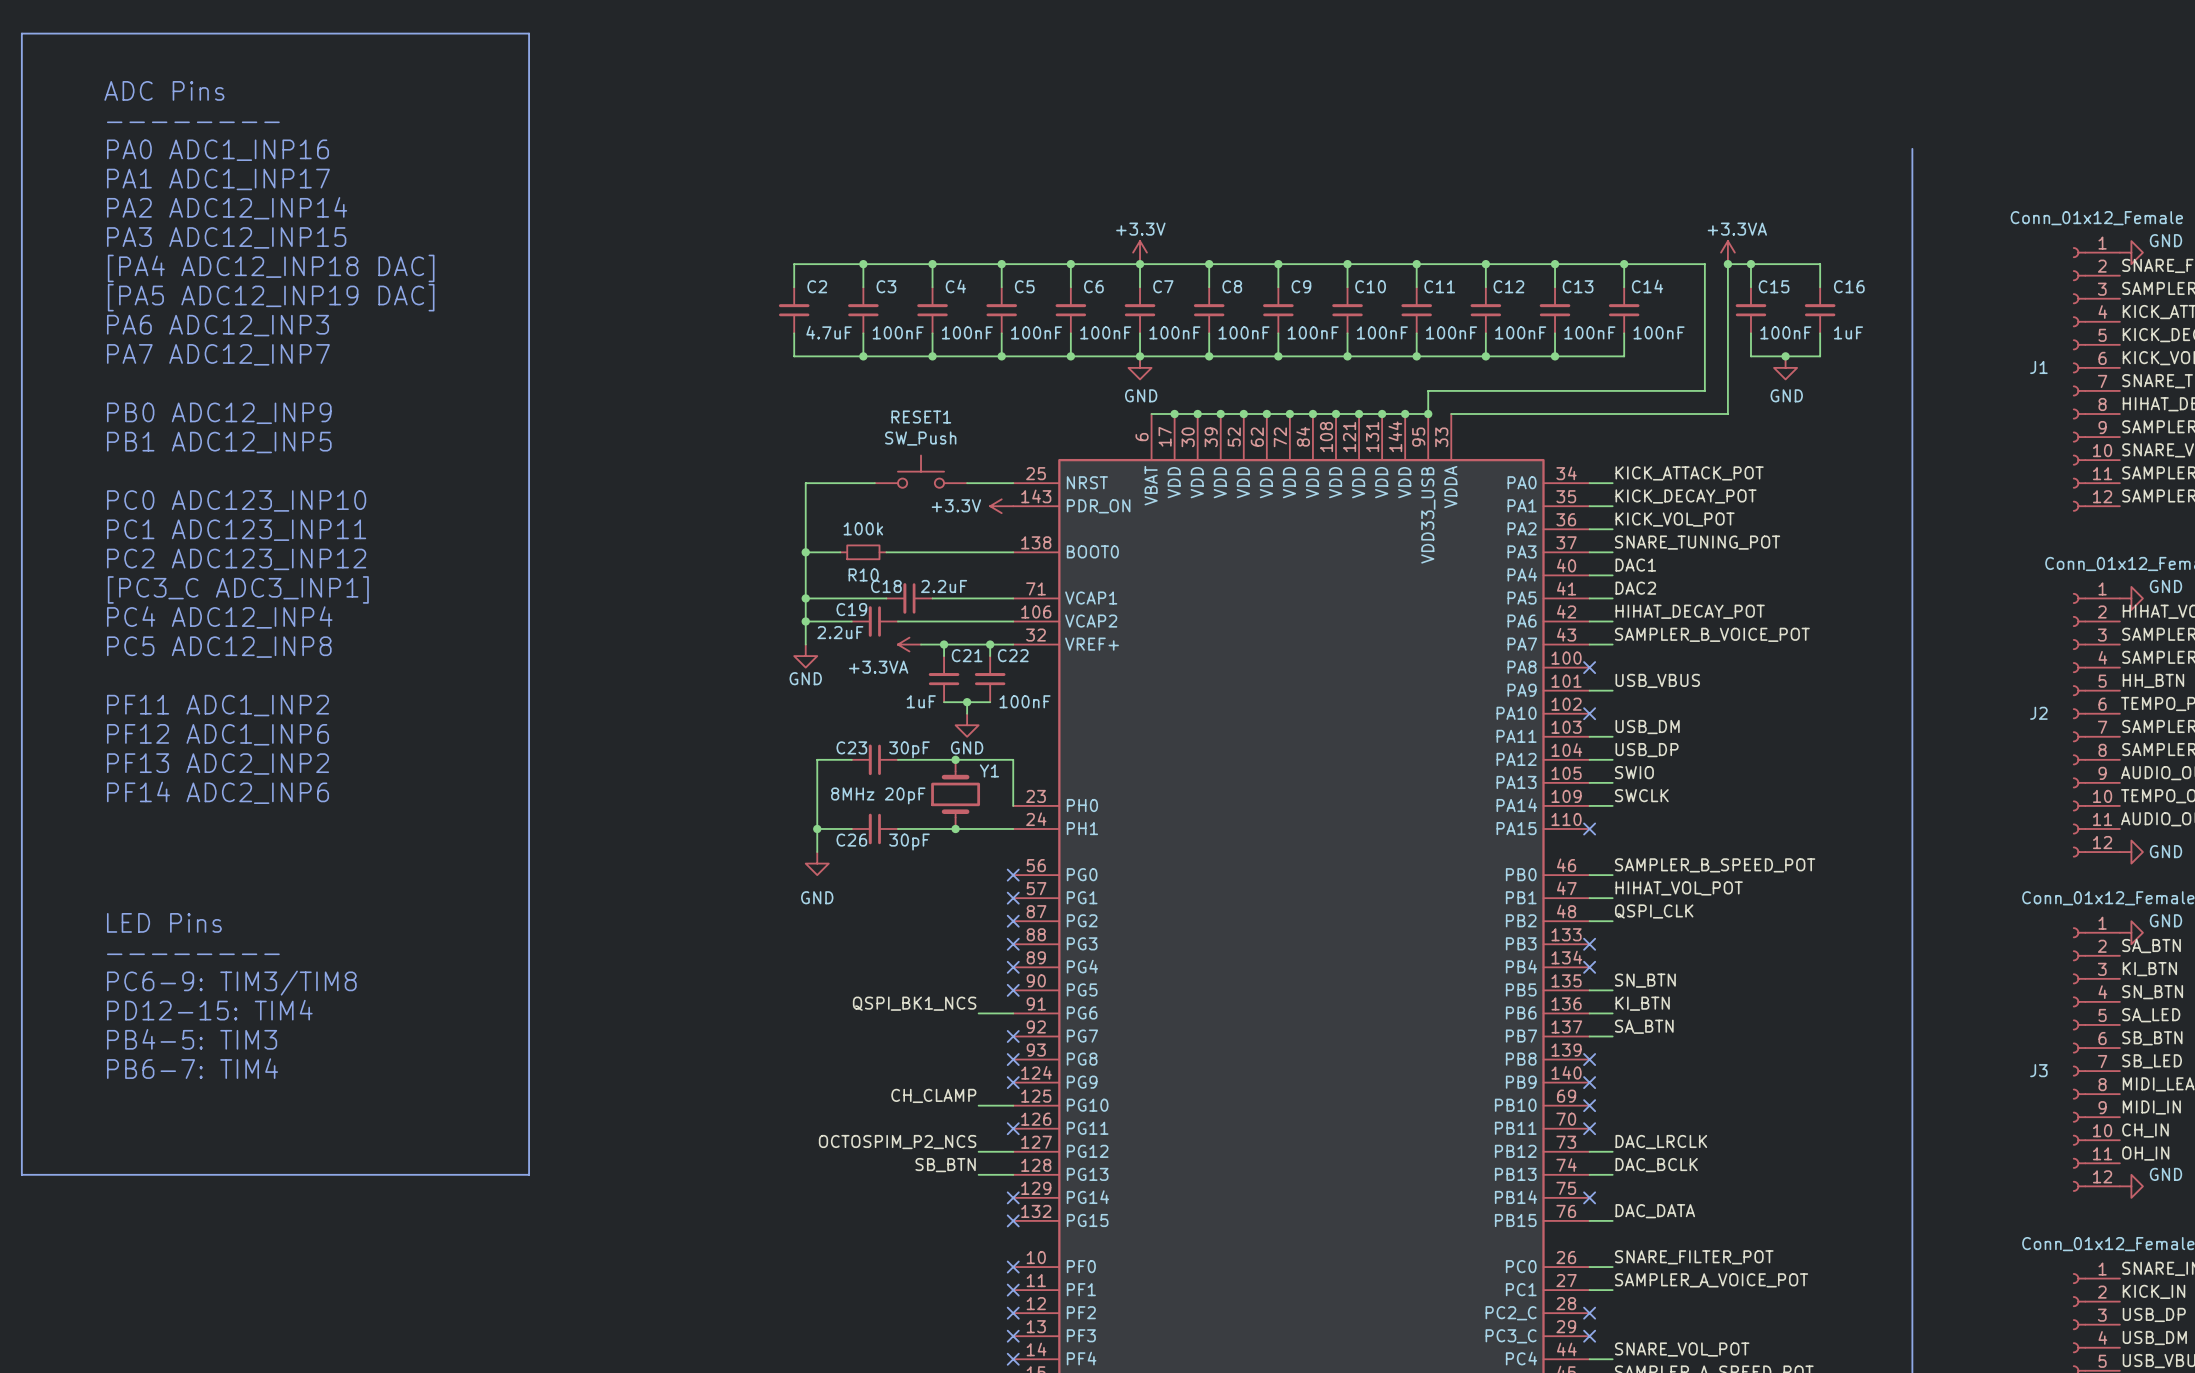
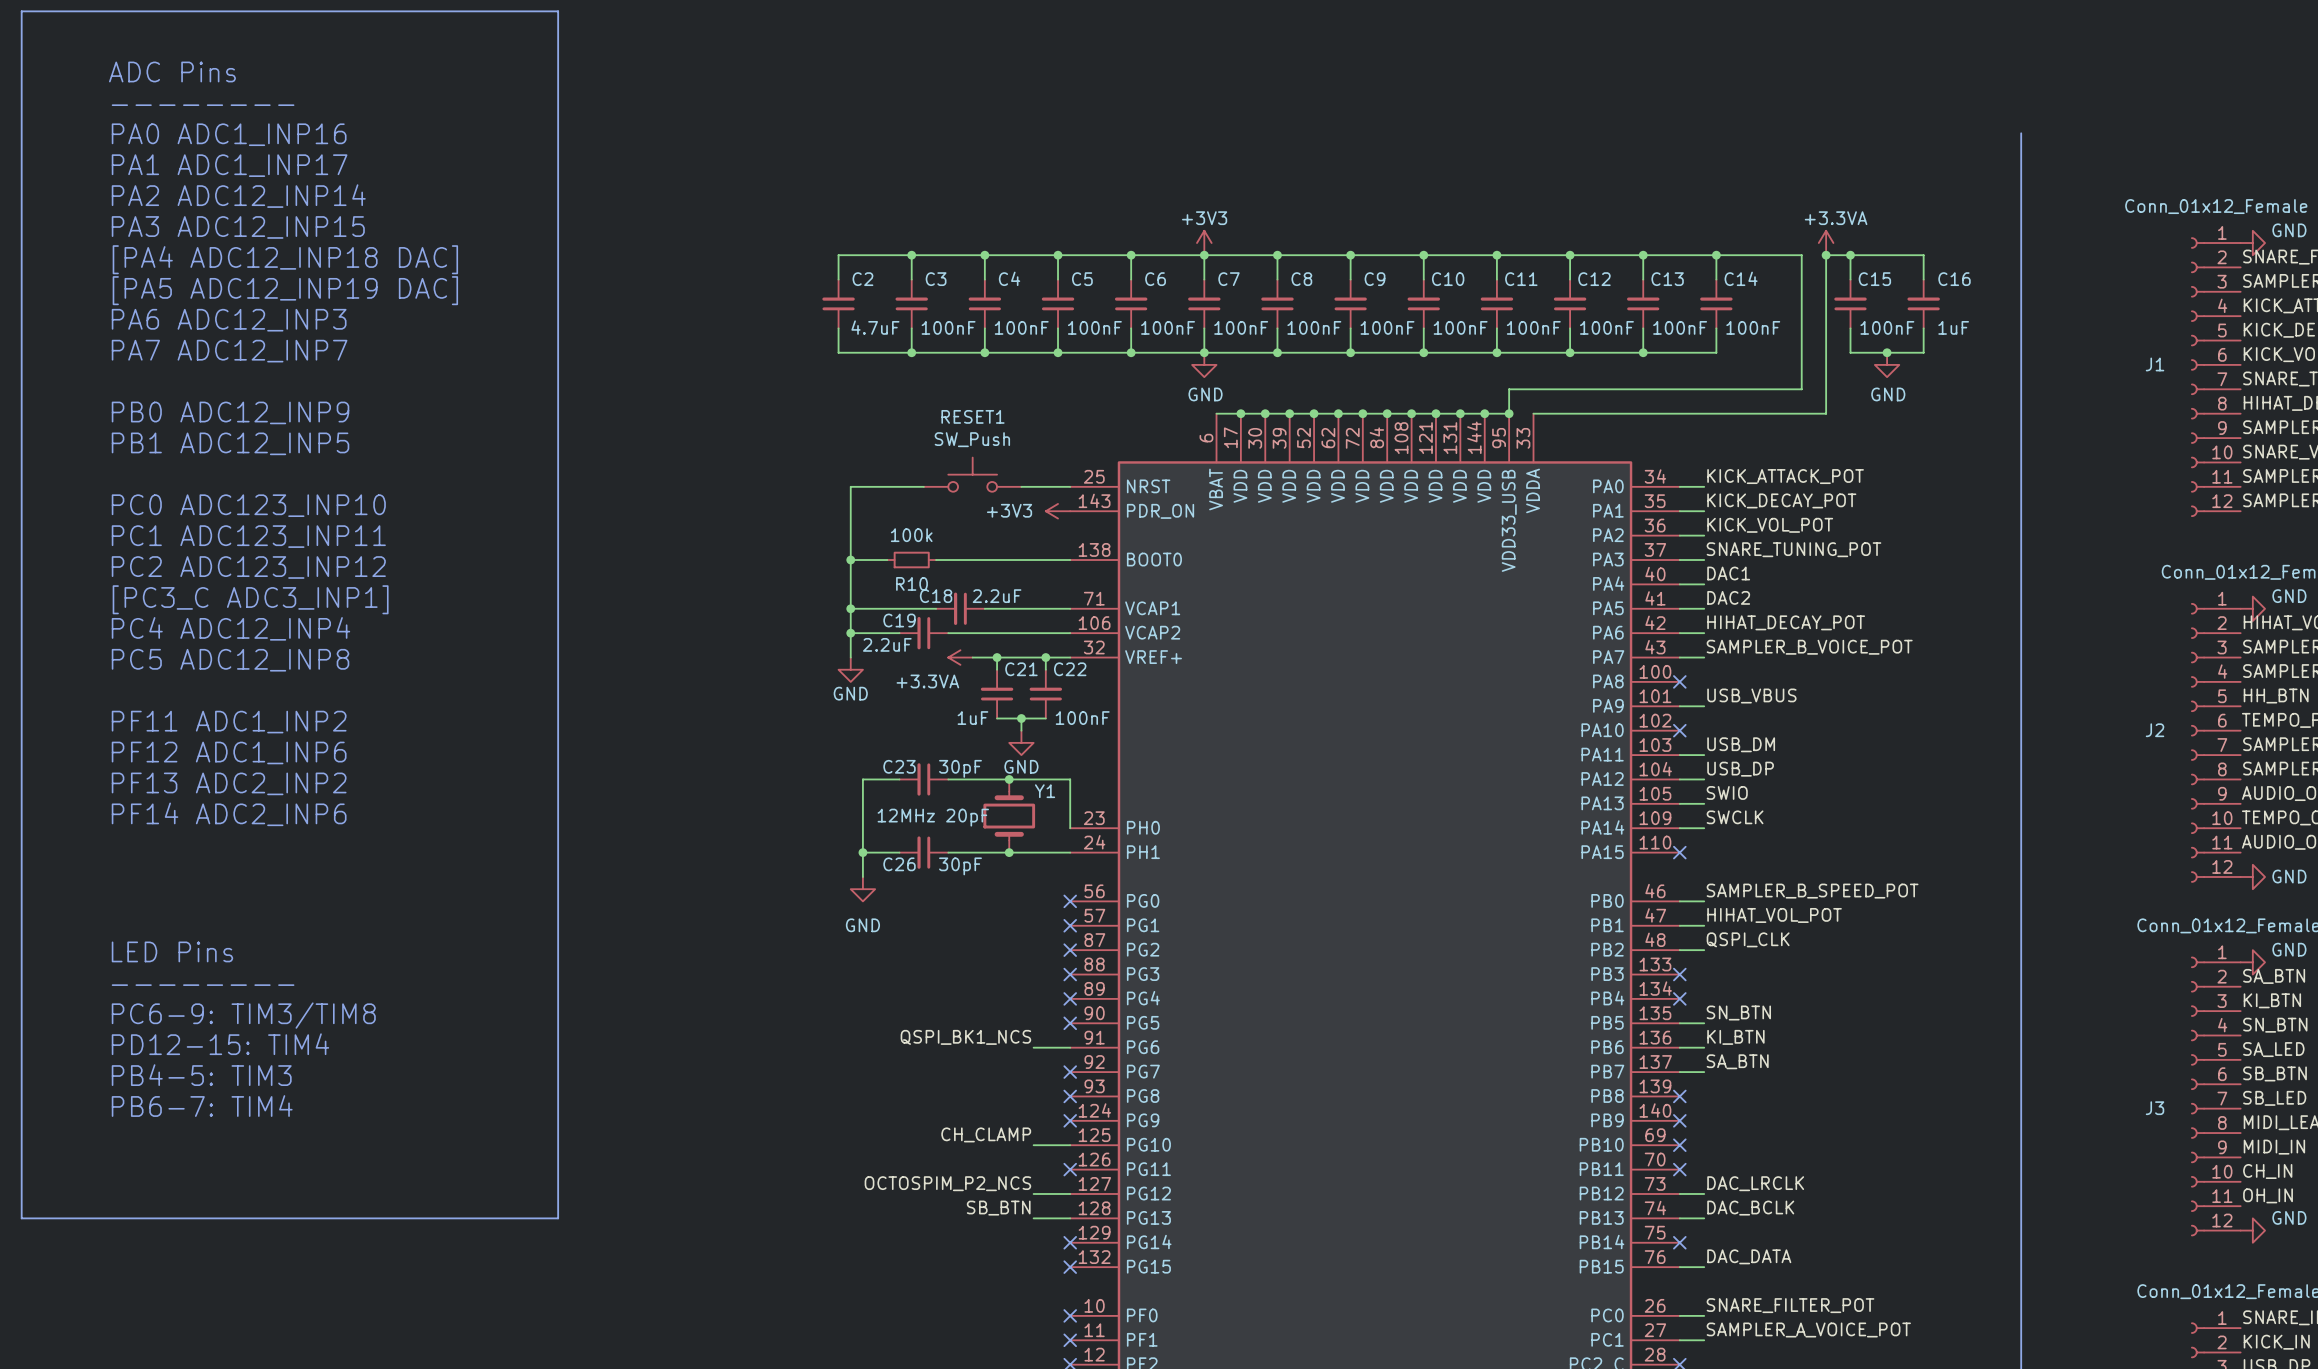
power symbol: +3.3V (1140, 252) -> +3V3 (1204, 243)
power symbol: +3.3V (1001, 506) -> +3V3 (1058, 511)
Y1 value: 8MHz 20pF (878, 795) -> 12MHz 20pF (933, 817)

